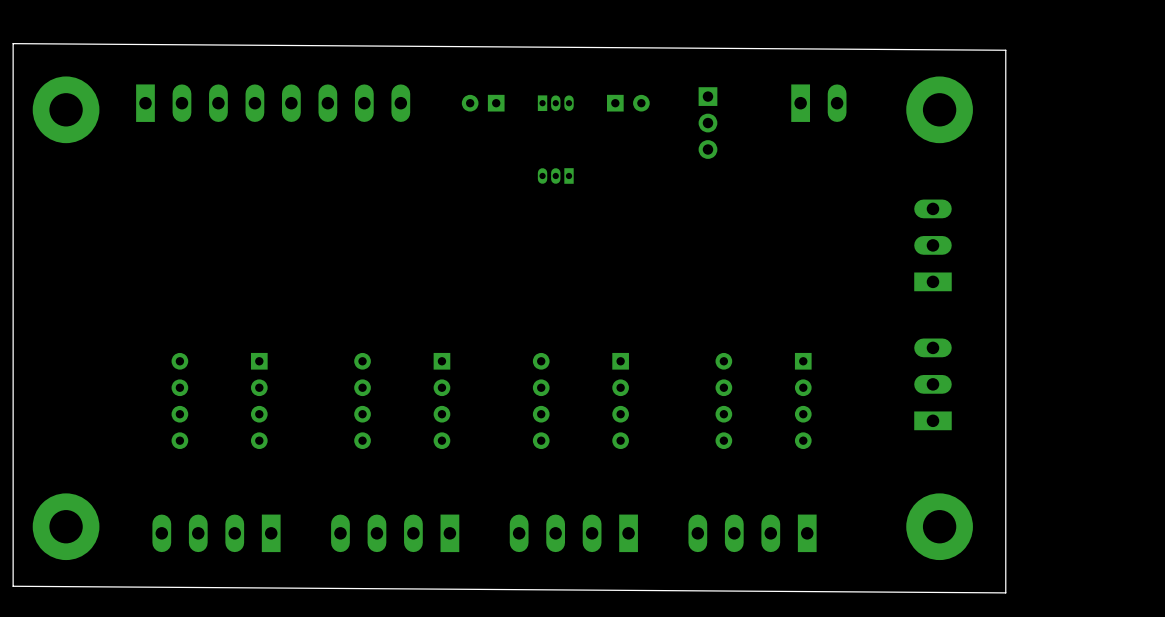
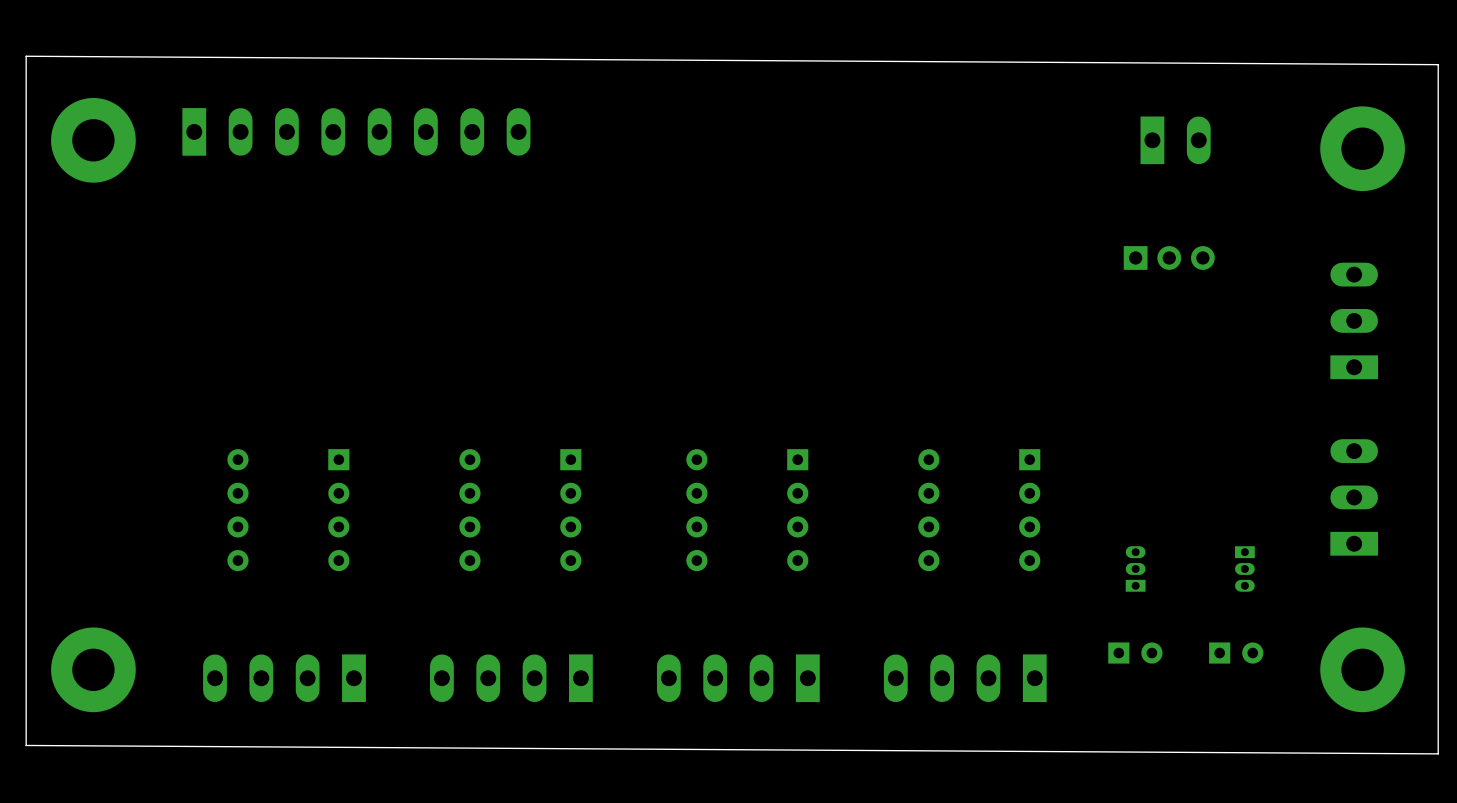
board edge: (13, 43) (1005, 50) (1005, 592) (13, 586) -> (26, 56) (1438, 64) (1438, 753) (26, 745)
part: (483, 103) -> none
part: (555, 103) -> none
part: (628, 103) -> none
part position: (818, 103) -> (1175, 140)
part position: (939, 109) -> (1362, 148)
part rotation: 0° (707, 123) -> 90° counterclockwise (1169, 257)
part position: (707, 123) -> (1169, 257)
part: (555, 175) -> none
part: (932, 245) -> none
part: none -> (1354, 320)
part: (932, 384) -> none
part: none -> (1354, 497)
part: none -> (1135, 568)
part: none -> (1244, 568)
part: none -> (1135, 653)
part: none -> (1236, 653)
part position: (939, 526) -> (1362, 669)

